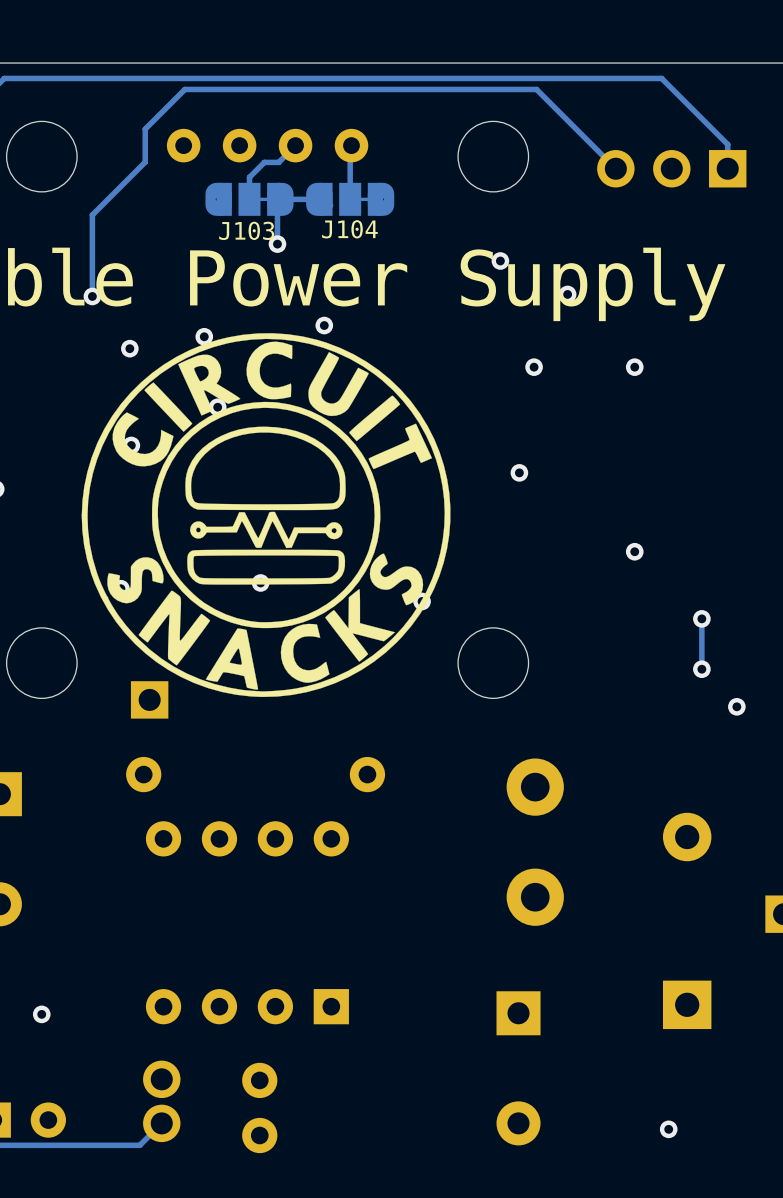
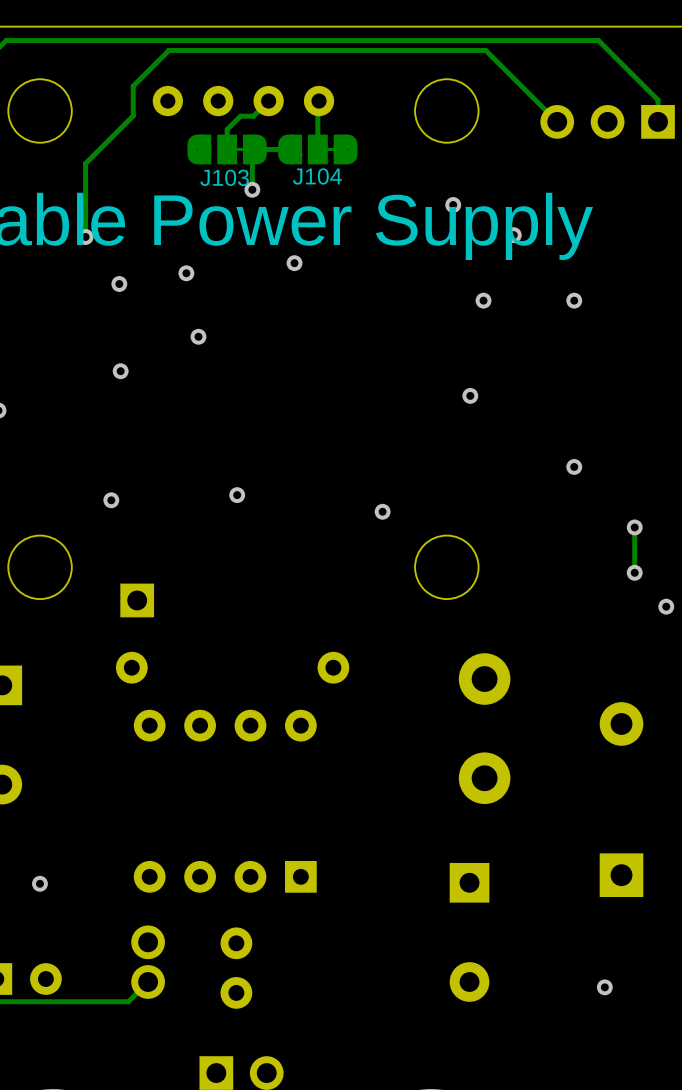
drawing: [81, 333, 451, 698] -> none

